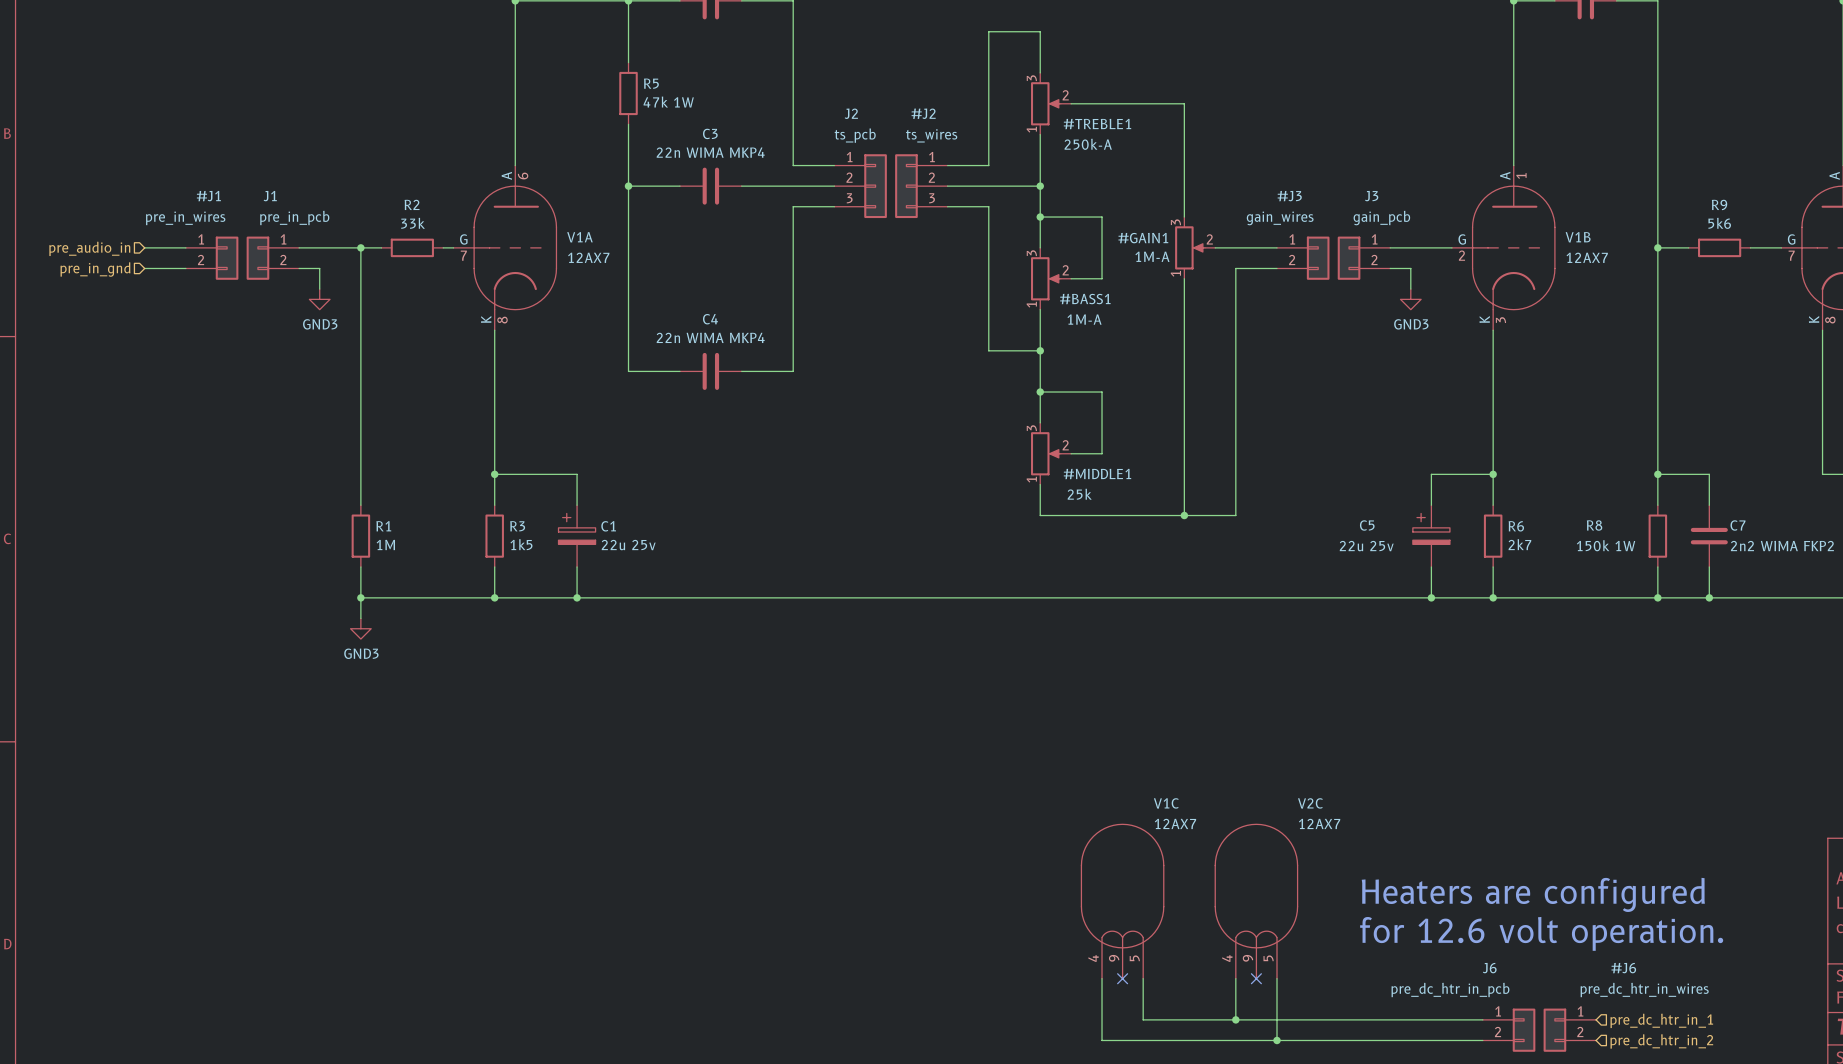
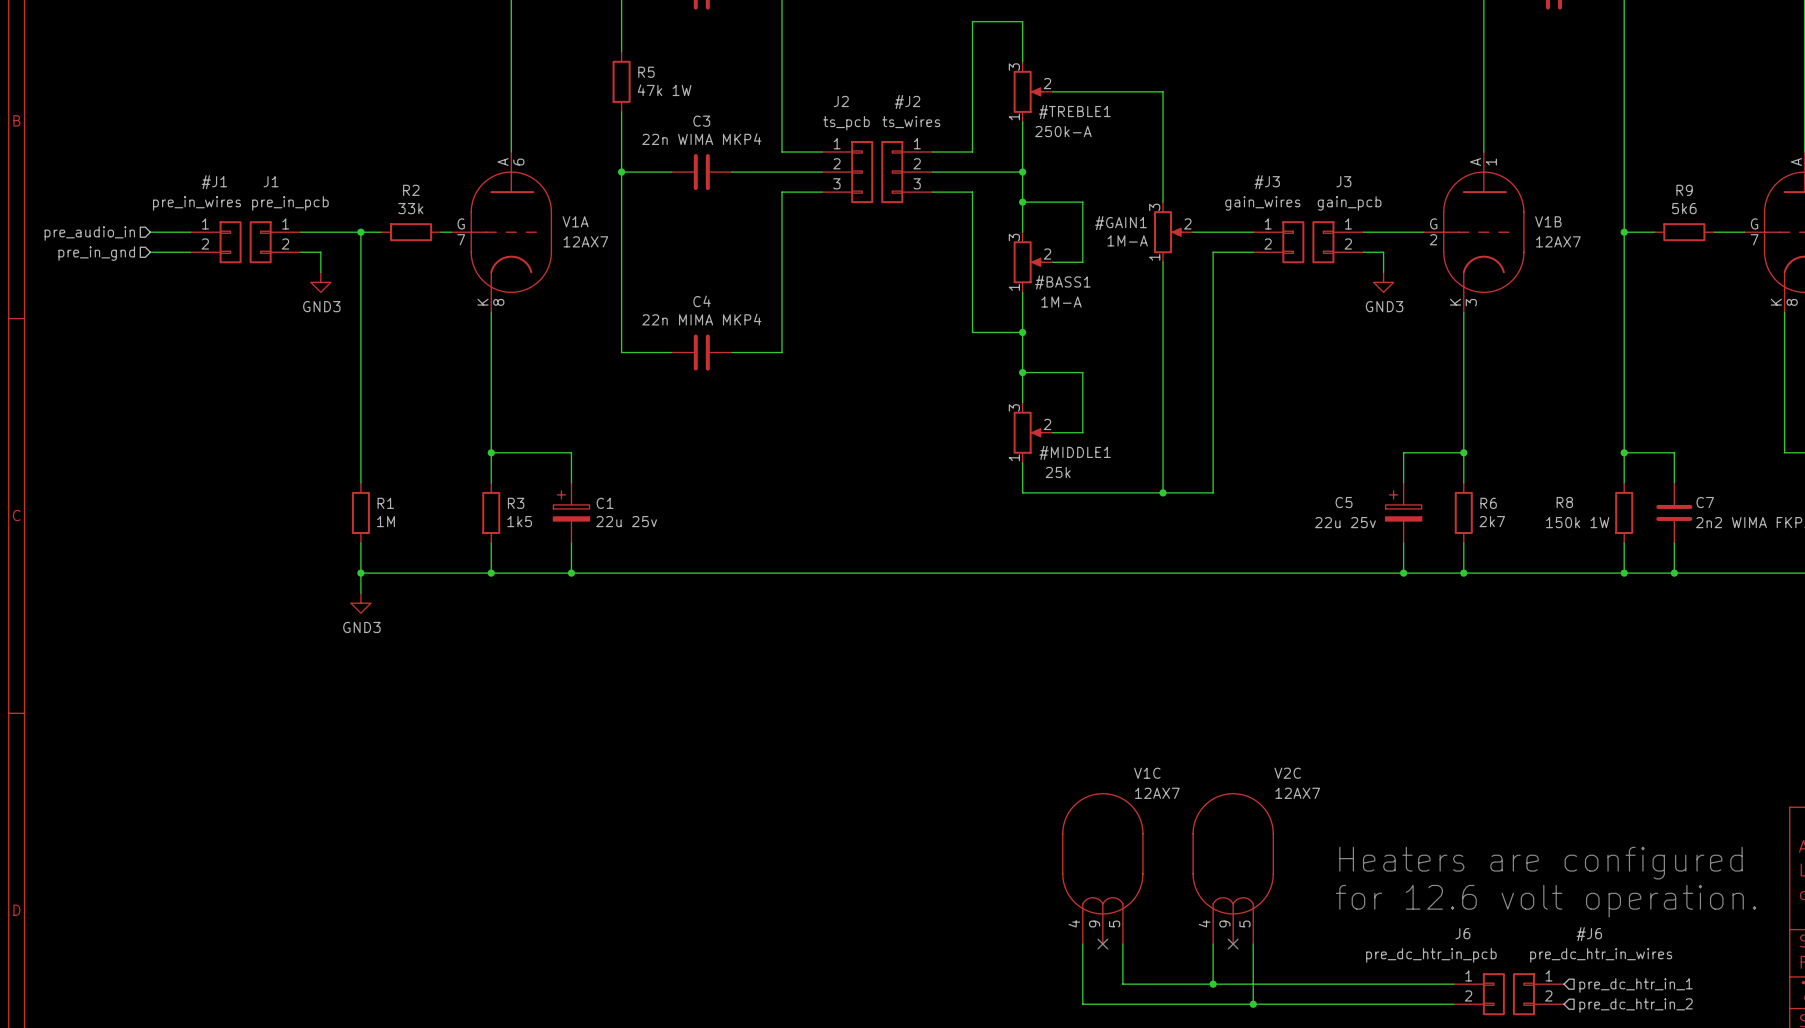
C4 value: 22n WIMA MKP4 (710, 337) -> 22n MIMA MKP4 (701, 319)

